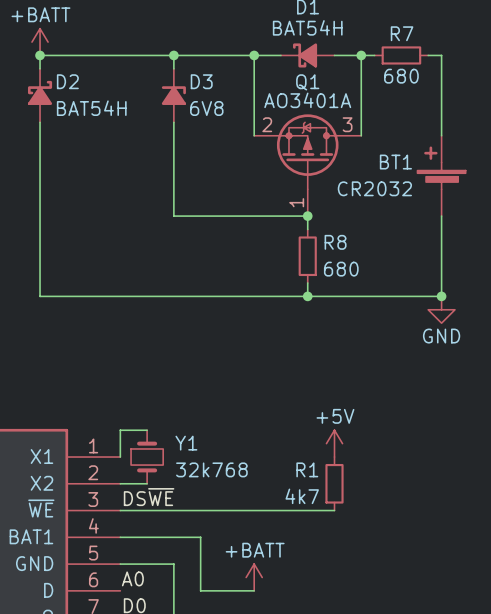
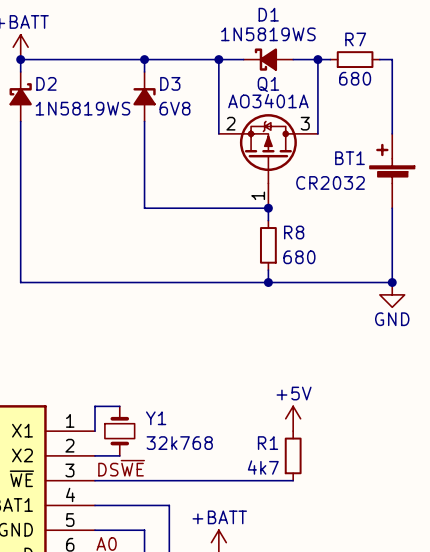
D1 value: BAT54H (307, 27) -> 1N5819WS (268, 34)
D2 value: BAT54H (91, 108) -> 1N5819WS (83, 108)

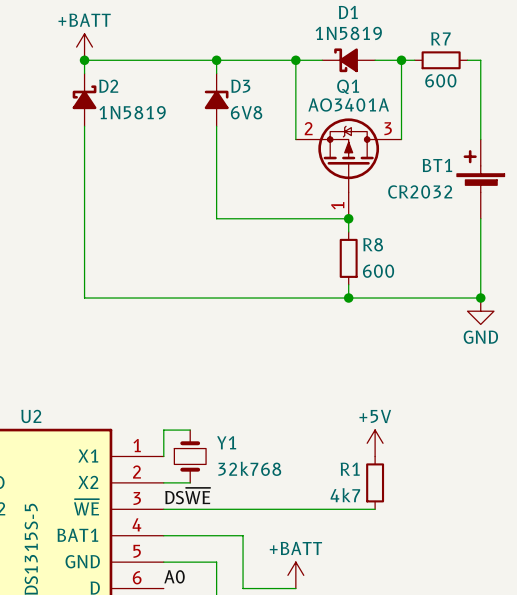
D1 value: 1N5819WS (268, 34) -> 1N5819 (348, 33)
R7 value: 680 (355, 78) -> 600 (440, 80)
D2 value: 1N5819WS (83, 108) -> 1N5819 (132, 112)
R8 value: 680 (299, 257) -> 600 (378, 271)

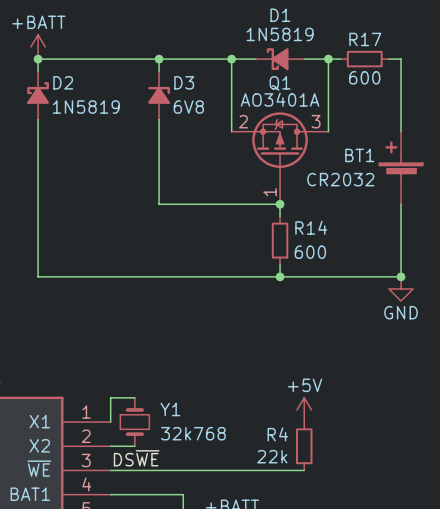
R7 name: R7 (440, 38) -> R17 (365, 39)
R8 name: R8 (373, 244) -> R14 (311, 227)
R1 name: R1 (350, 469) -> R4 (277, 434)
R1 value: 4k7 (345, 495) -> 22k (272, 456)

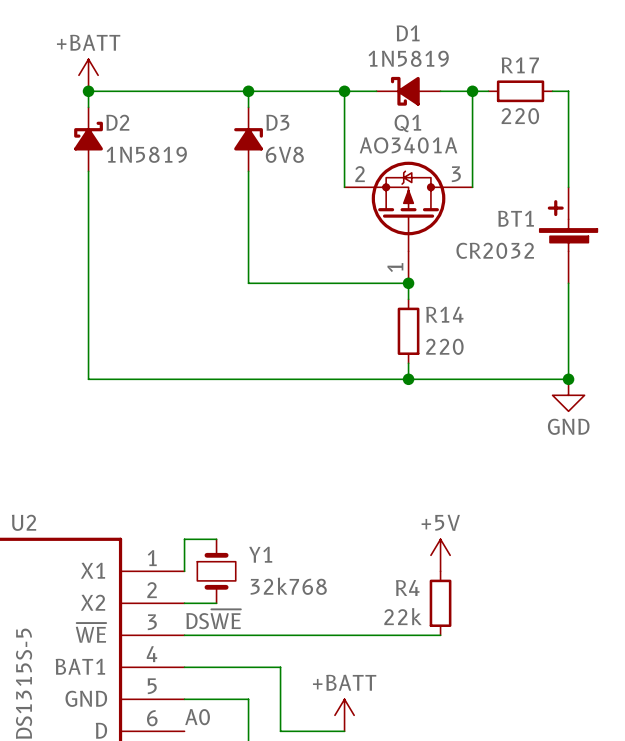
R17 value: 600 (364, 77) -> 220 (520, 116)
R14 value: 600 (310, 252) -> 220 (444, 346)

